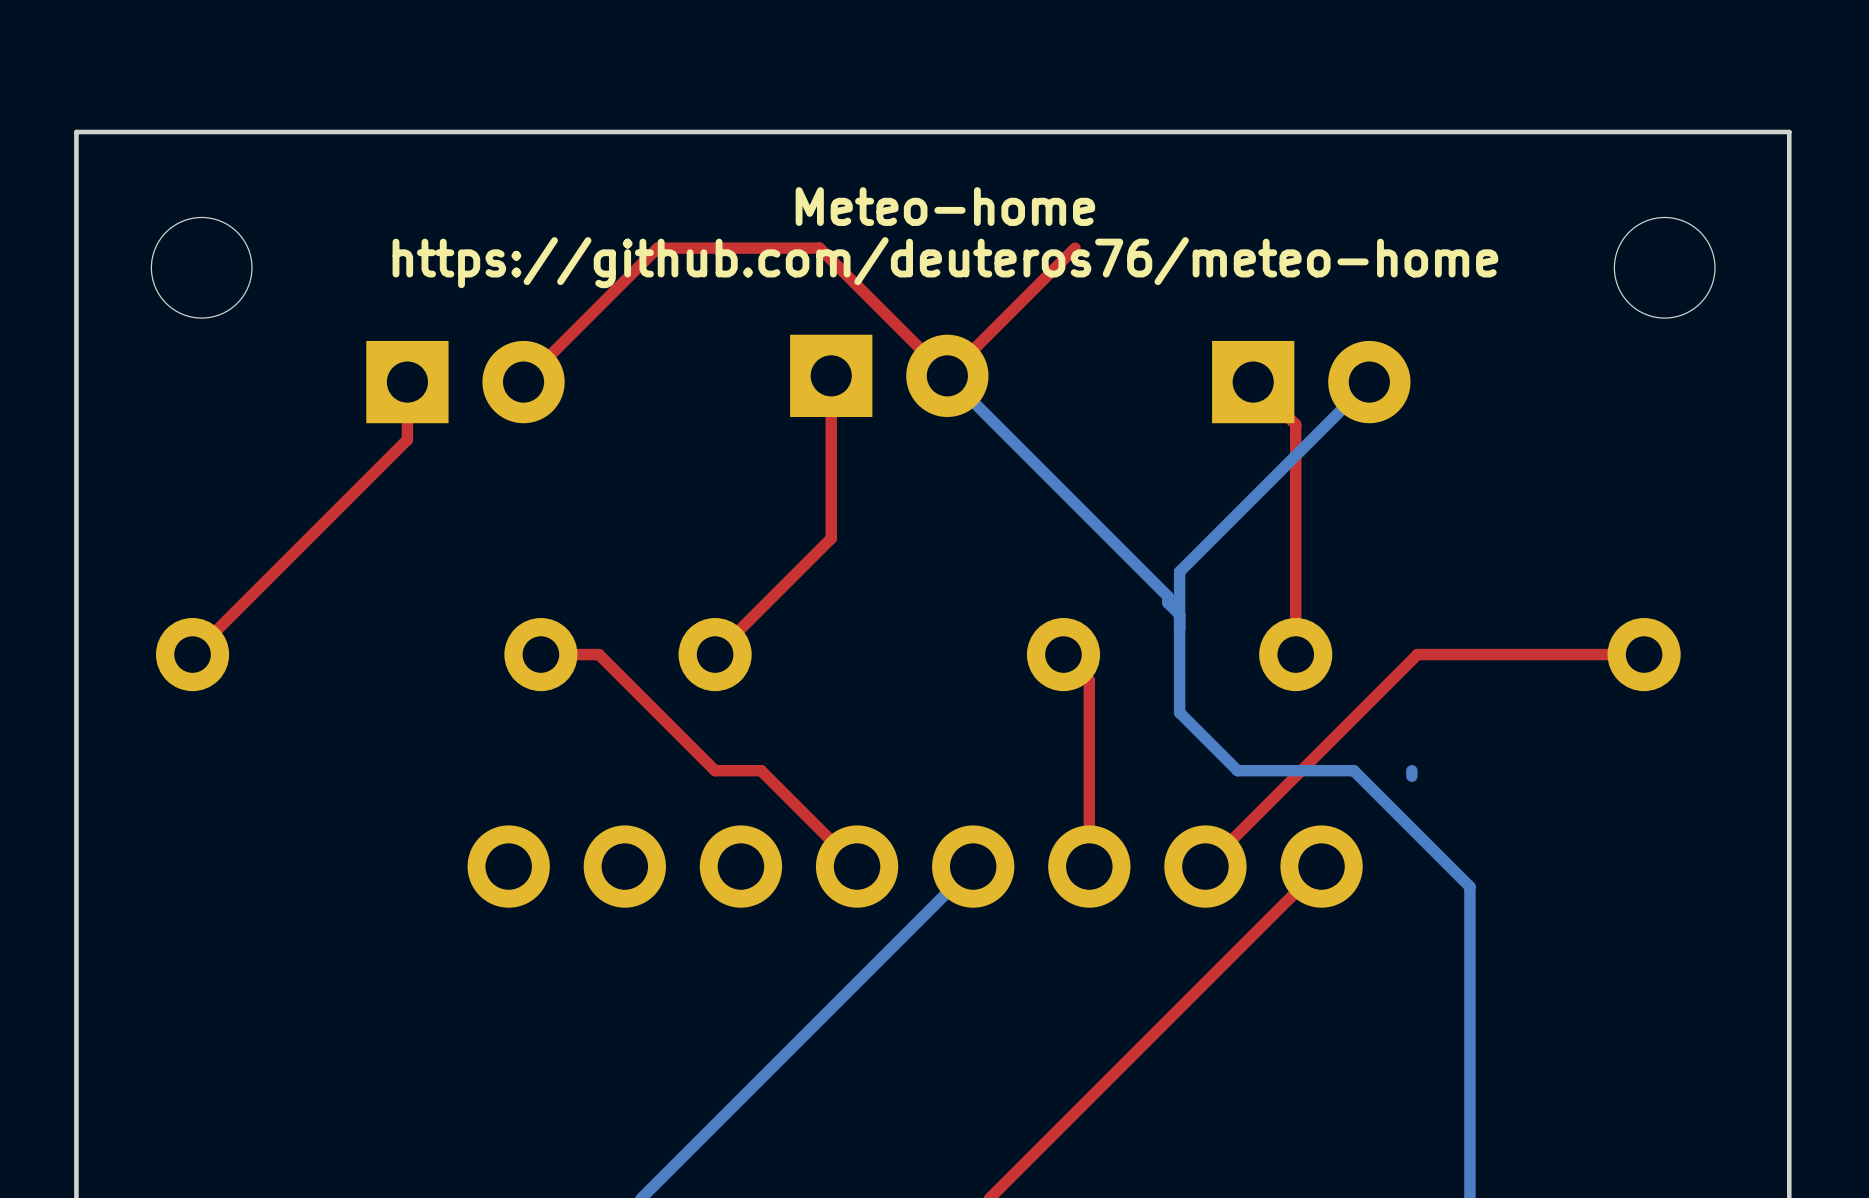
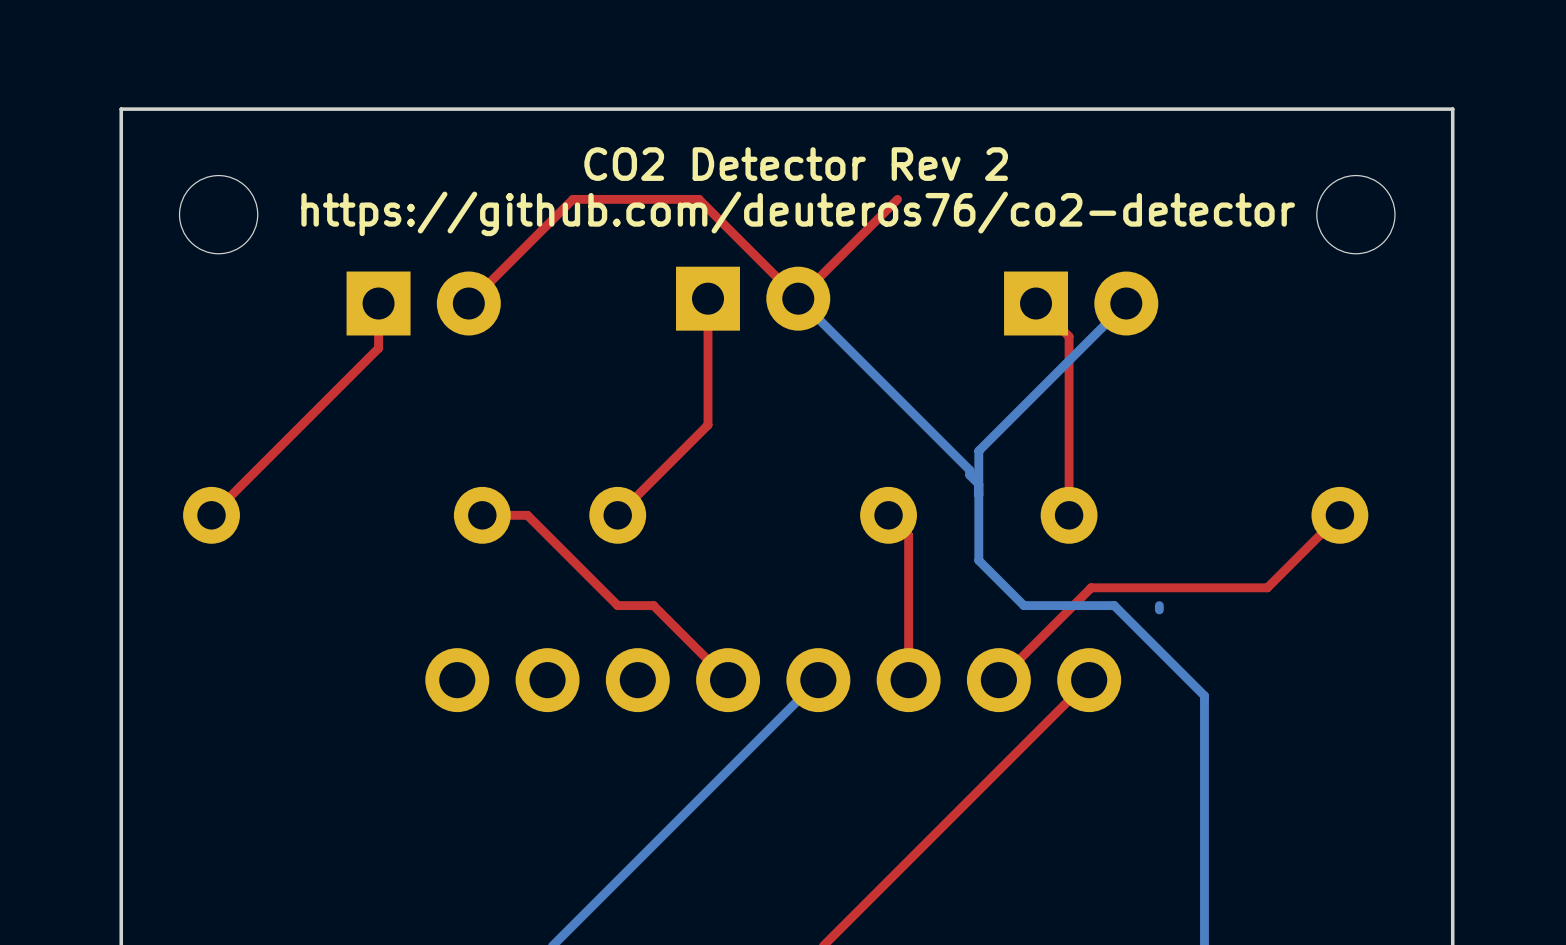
text: Meteo-home (945, 206) -> CO2 Detector Rev 2 (796, 164)
text: https://github.com/deuteros76/meteo-home (945, 262) -> https://github.com/deuteros76/co2-detector (798, 213)
top track: (1644, 654) (1417, 654) (1324, 747) -> (1339, 515) (1267, 587) (1091, 587)

